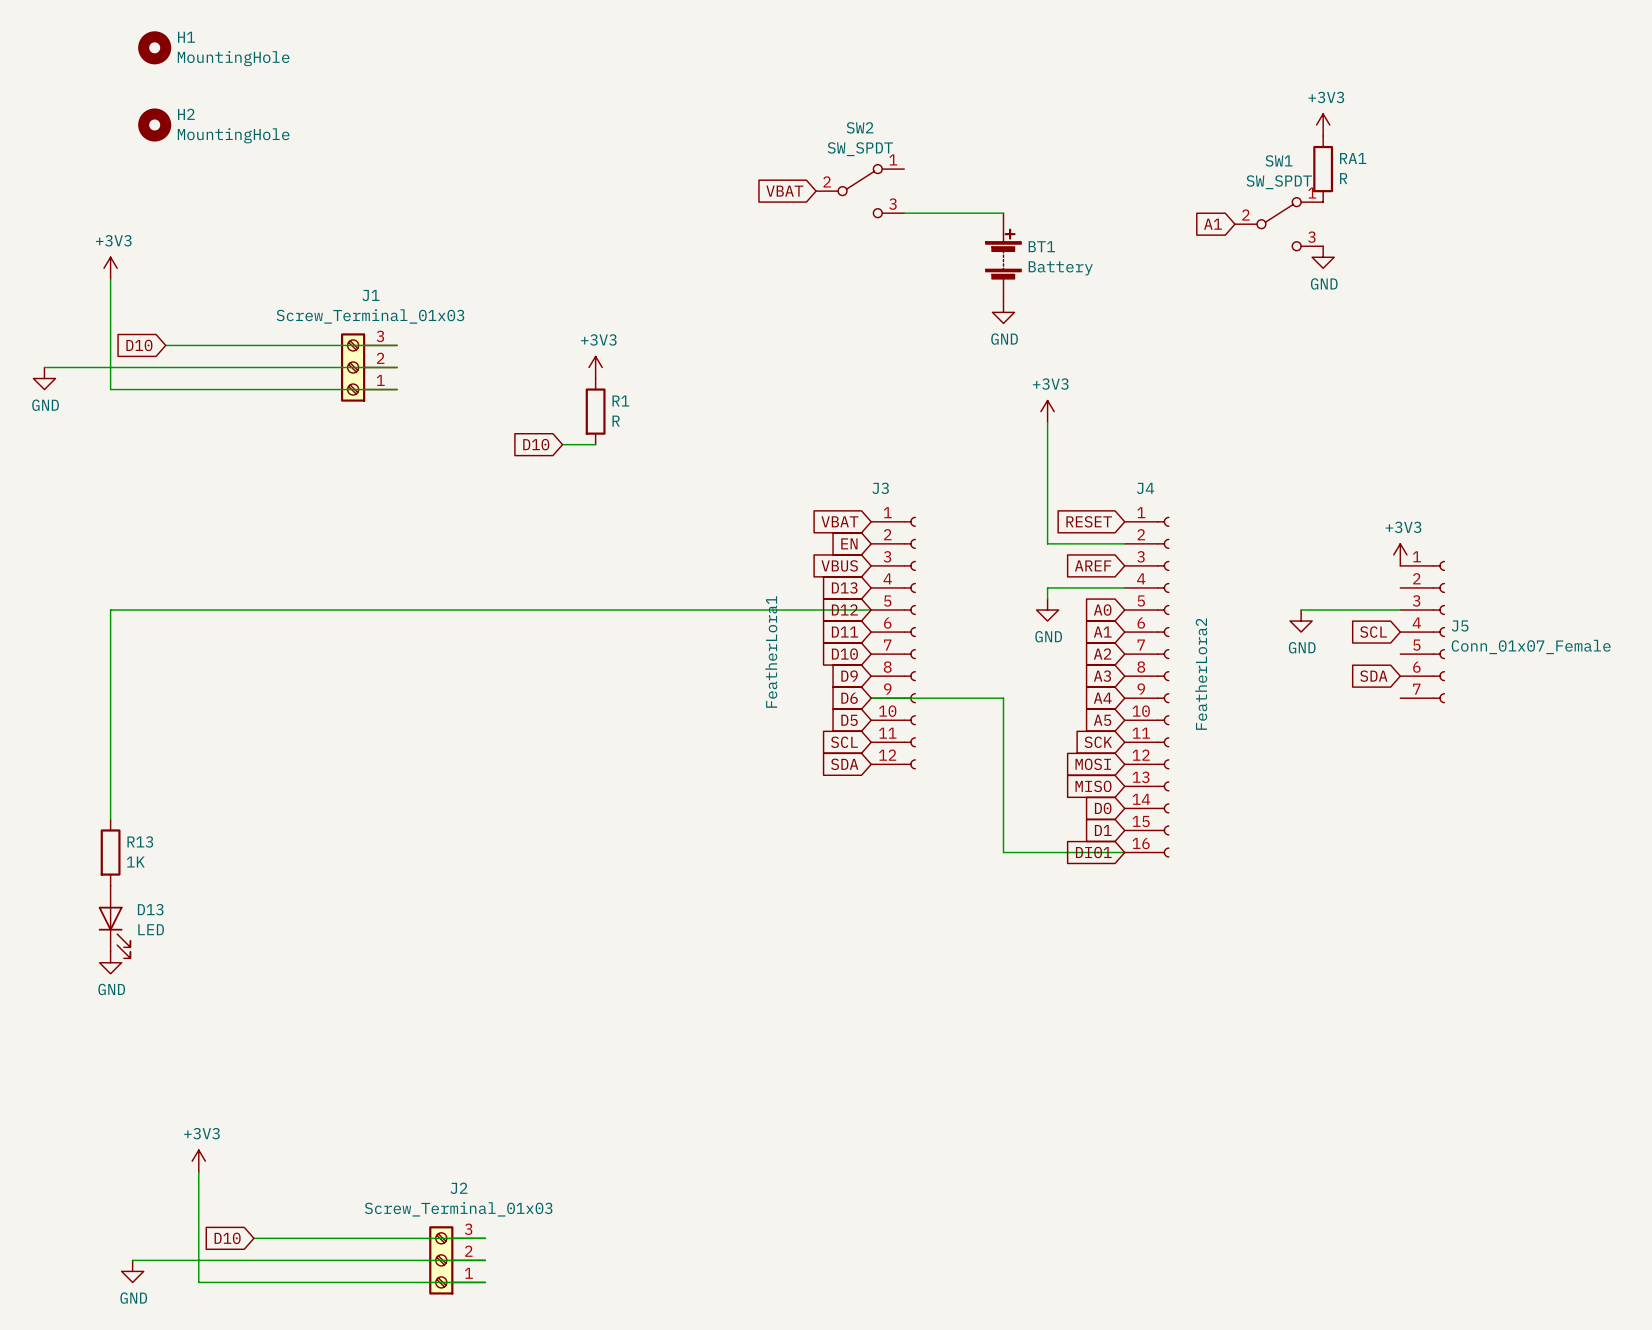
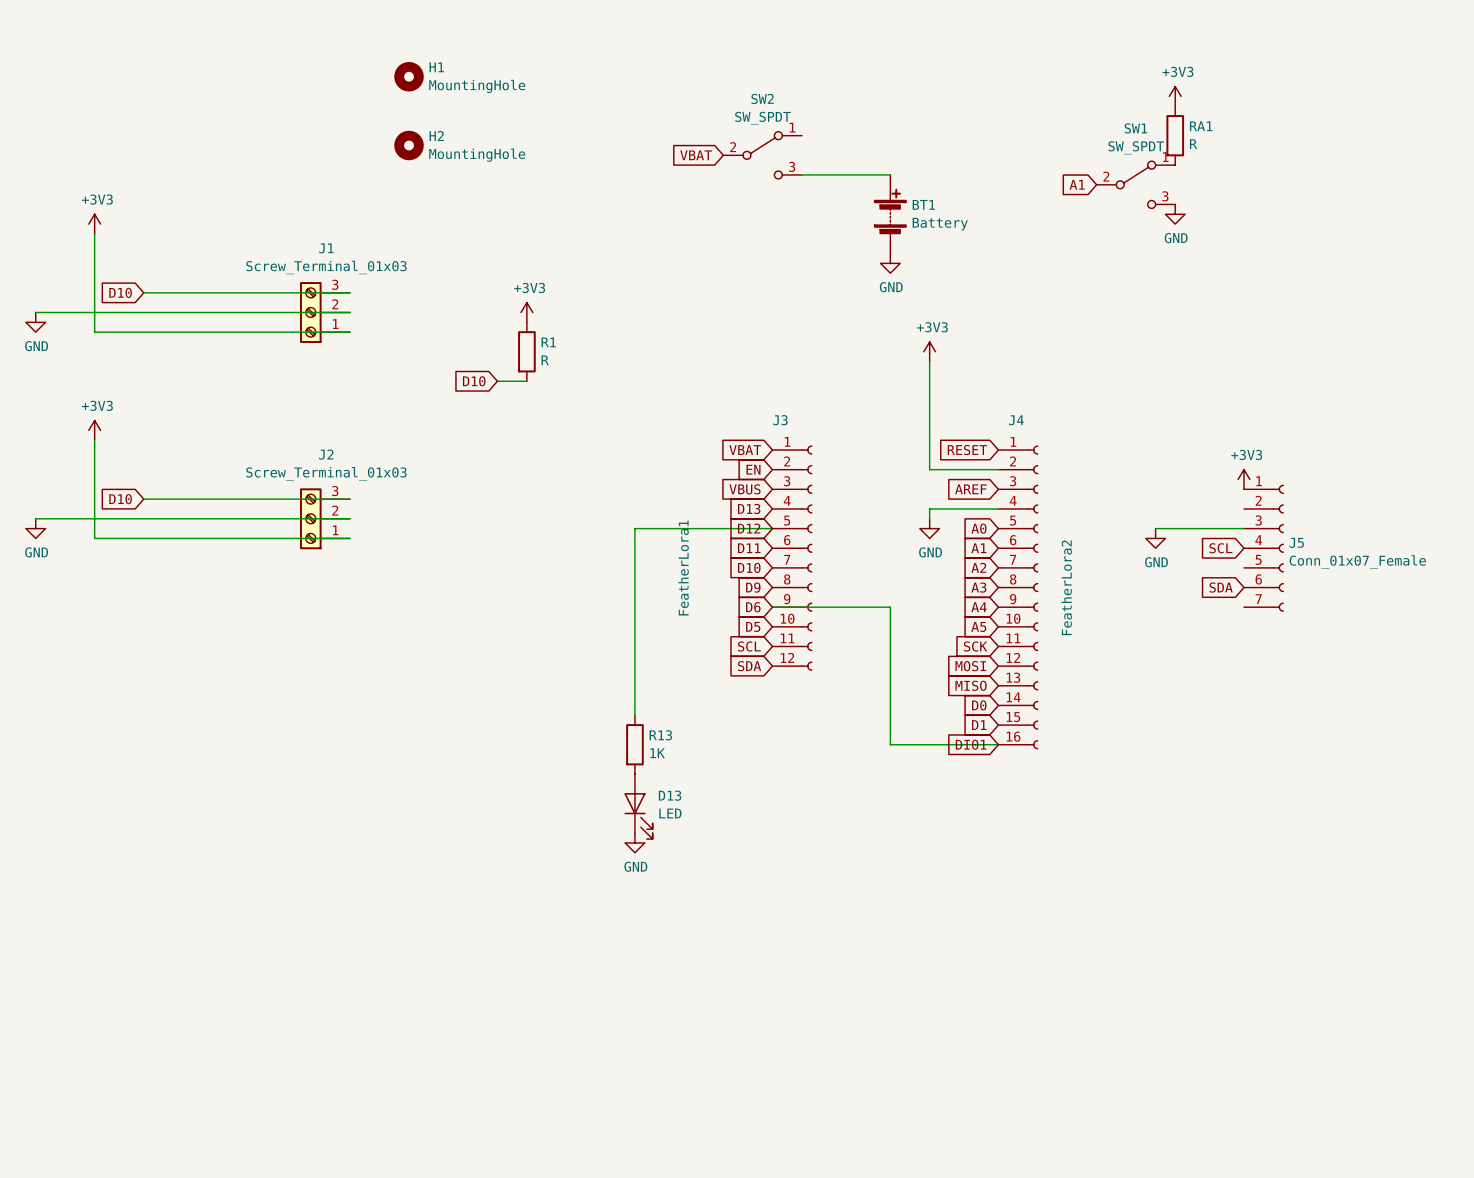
H1 position: (154, 47) -> (409, 76)
H2 position: (154, 124) -> (409, 145)
power symbol: none -> +3V3 (94, 430)
global label: none -> D10 (120, 499)
wire: none -> (143, 499) (350, 499)
wire: none -> (35, 518) (350, 518)
power symbol: none -> GND (35, 528)
wire: (110, 610) (716, 610) -> (94, 528) (94, 440)
wire: none -> (634, 528) (634, 715)
wire: (110, 621) (110, 819) -> (94, 538) (350, 538)
R13 position: (110, 852) -> (634, 744)
D13 position: (114, 921) -> (638, 806)
power symbol: GND (110, 962) -> none
power symbol: none -> GND (634, 842)
power symbol: +3V3 (198, 1161) -> none
wire: (198, 1172) (198, 1282) (485, 1282) -> none
global label: D10 (227, 1238) -> none
wire: (253, 1238) (485, 1238) -> none
wire: (132, 1260) (485, 1260) -> none
J2 position: (457, 1260) -> (325, 518)
power symbol: GND (132, 1271) -> none

